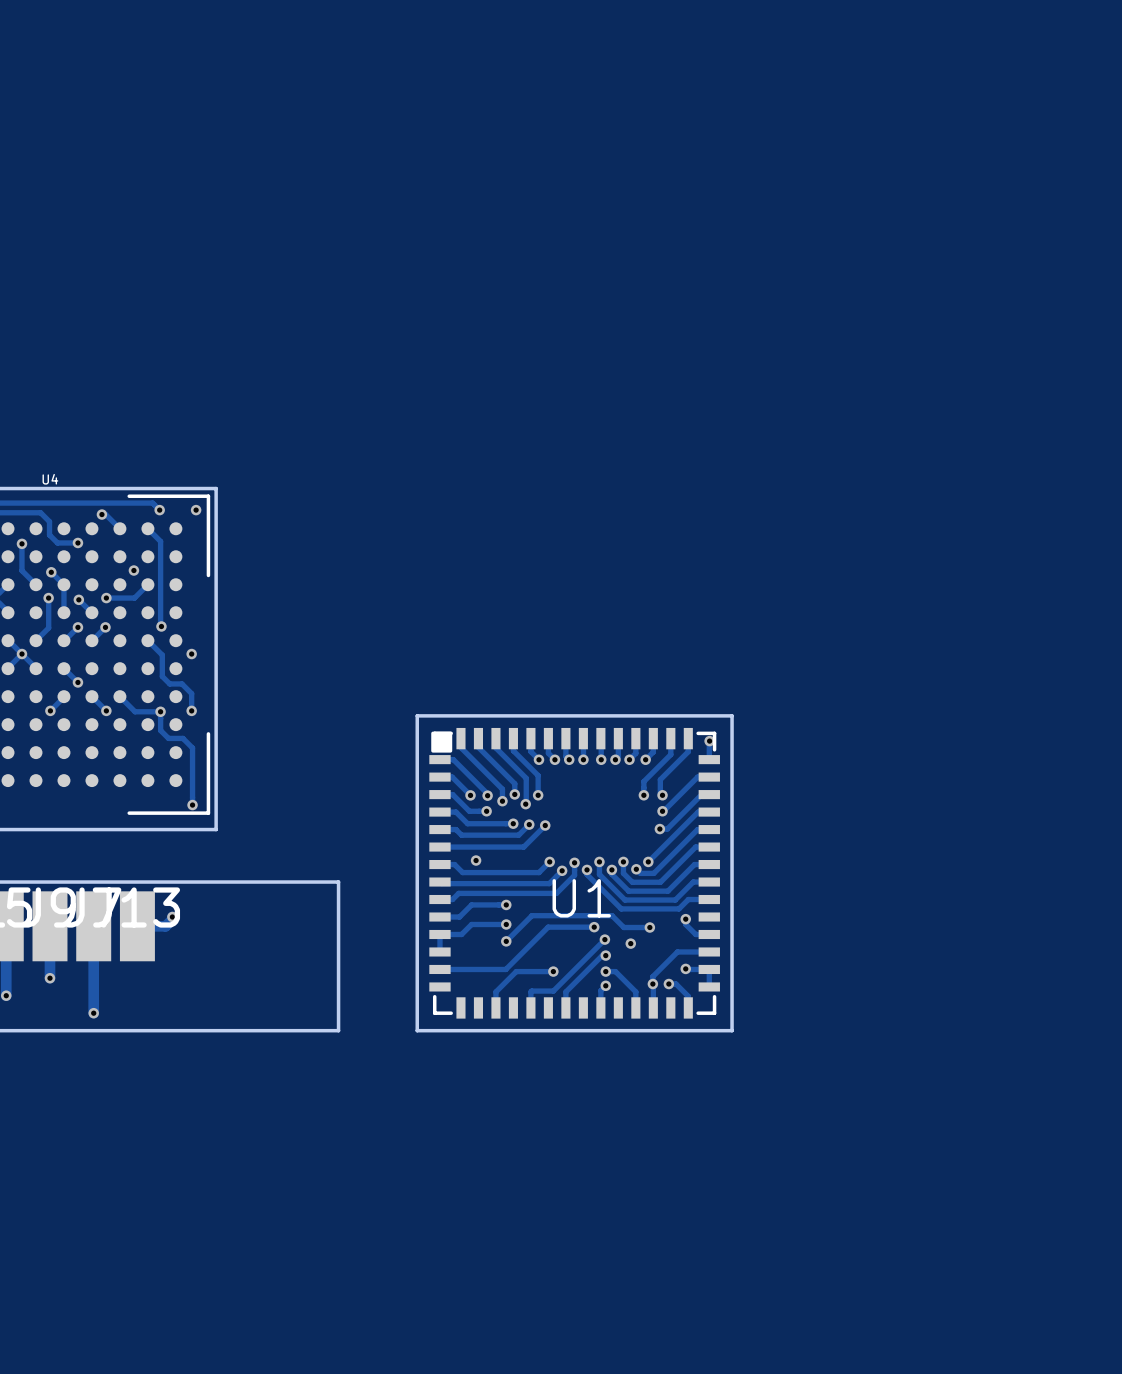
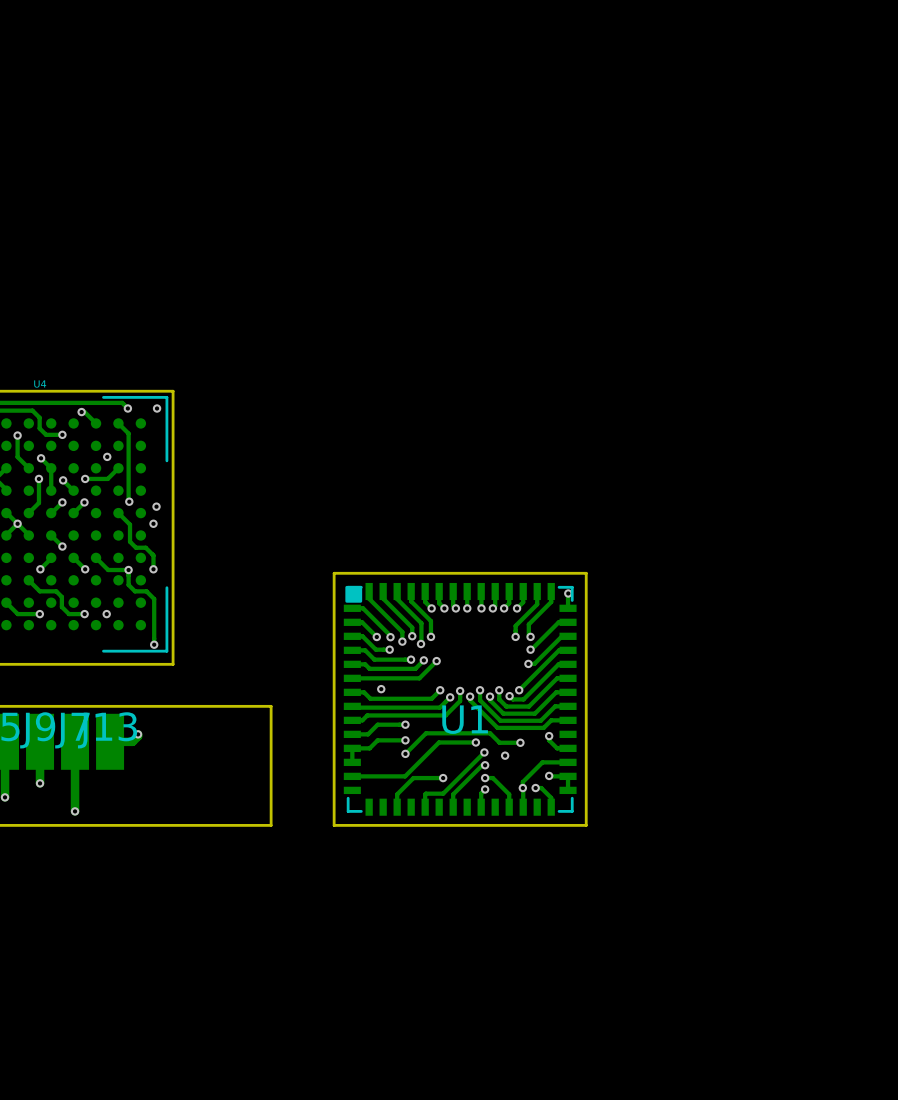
via: none -> (156, 506)
track: none -> (28, 580) (39, 591) (56, 591) (61, 596) (61, 606) (69, 614) (84, 614)
track: none -> (6, 602) (17, 614) (39, 614)
via: none -> (39, 614)
via: none -> (84, 614)
via: none -> (106, 614)

